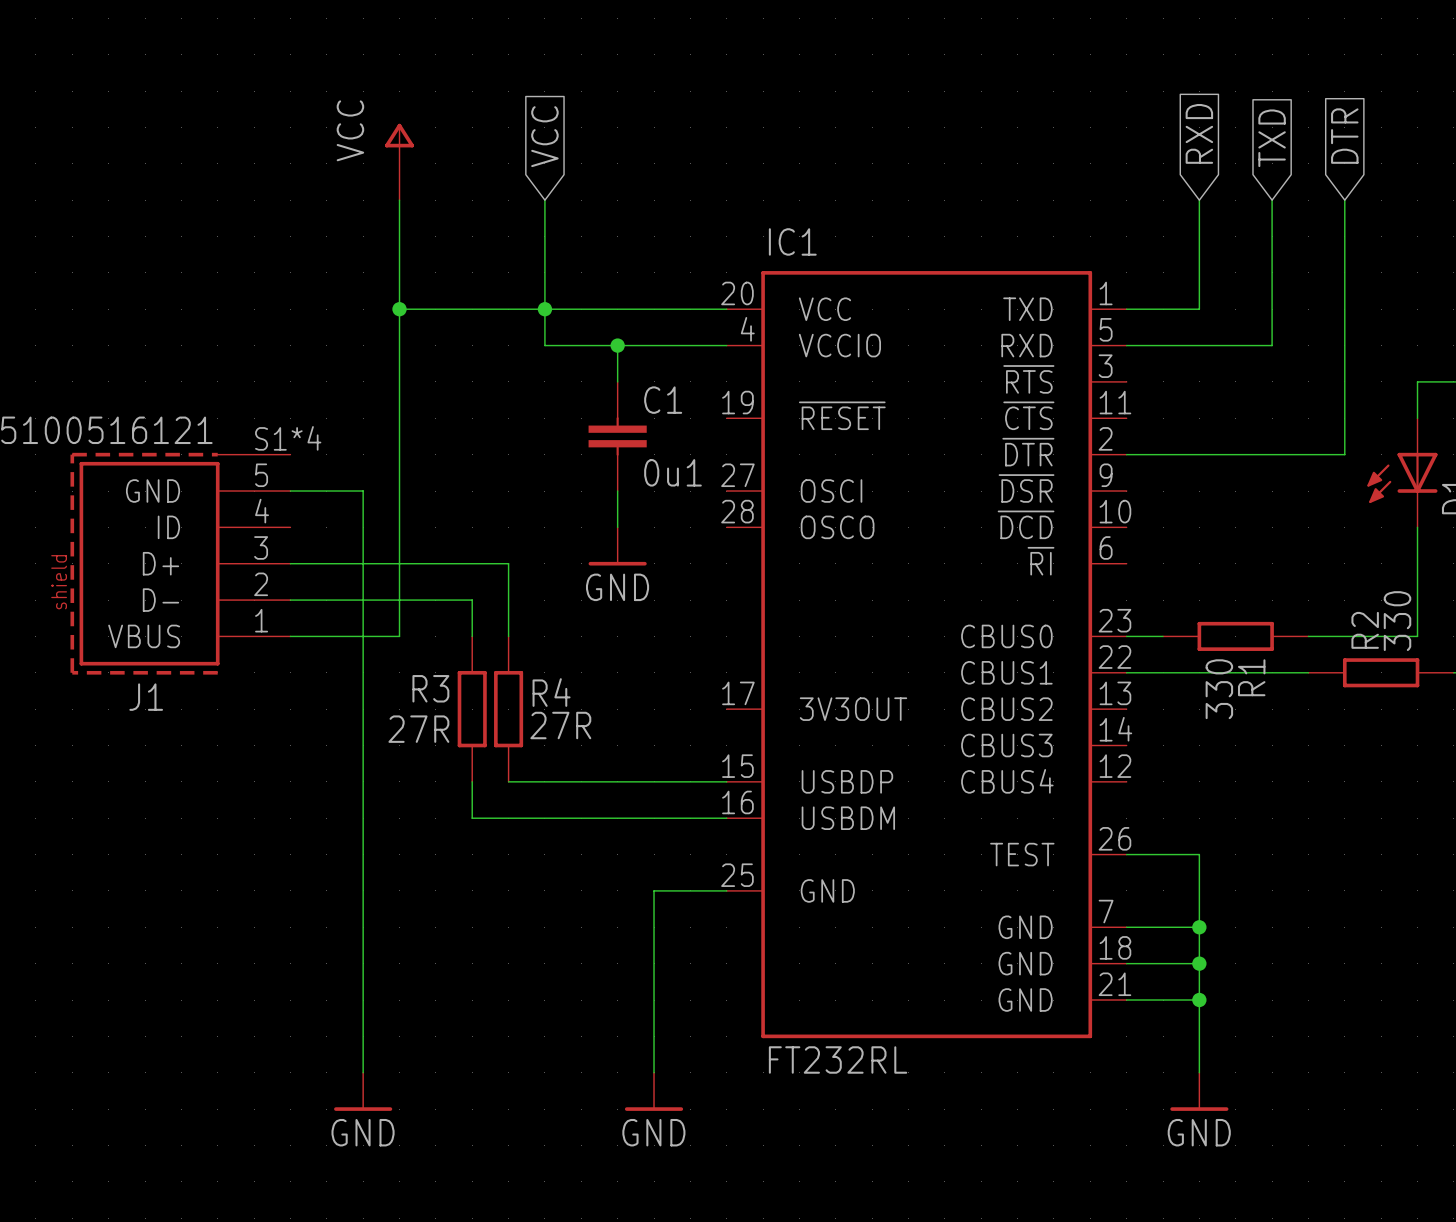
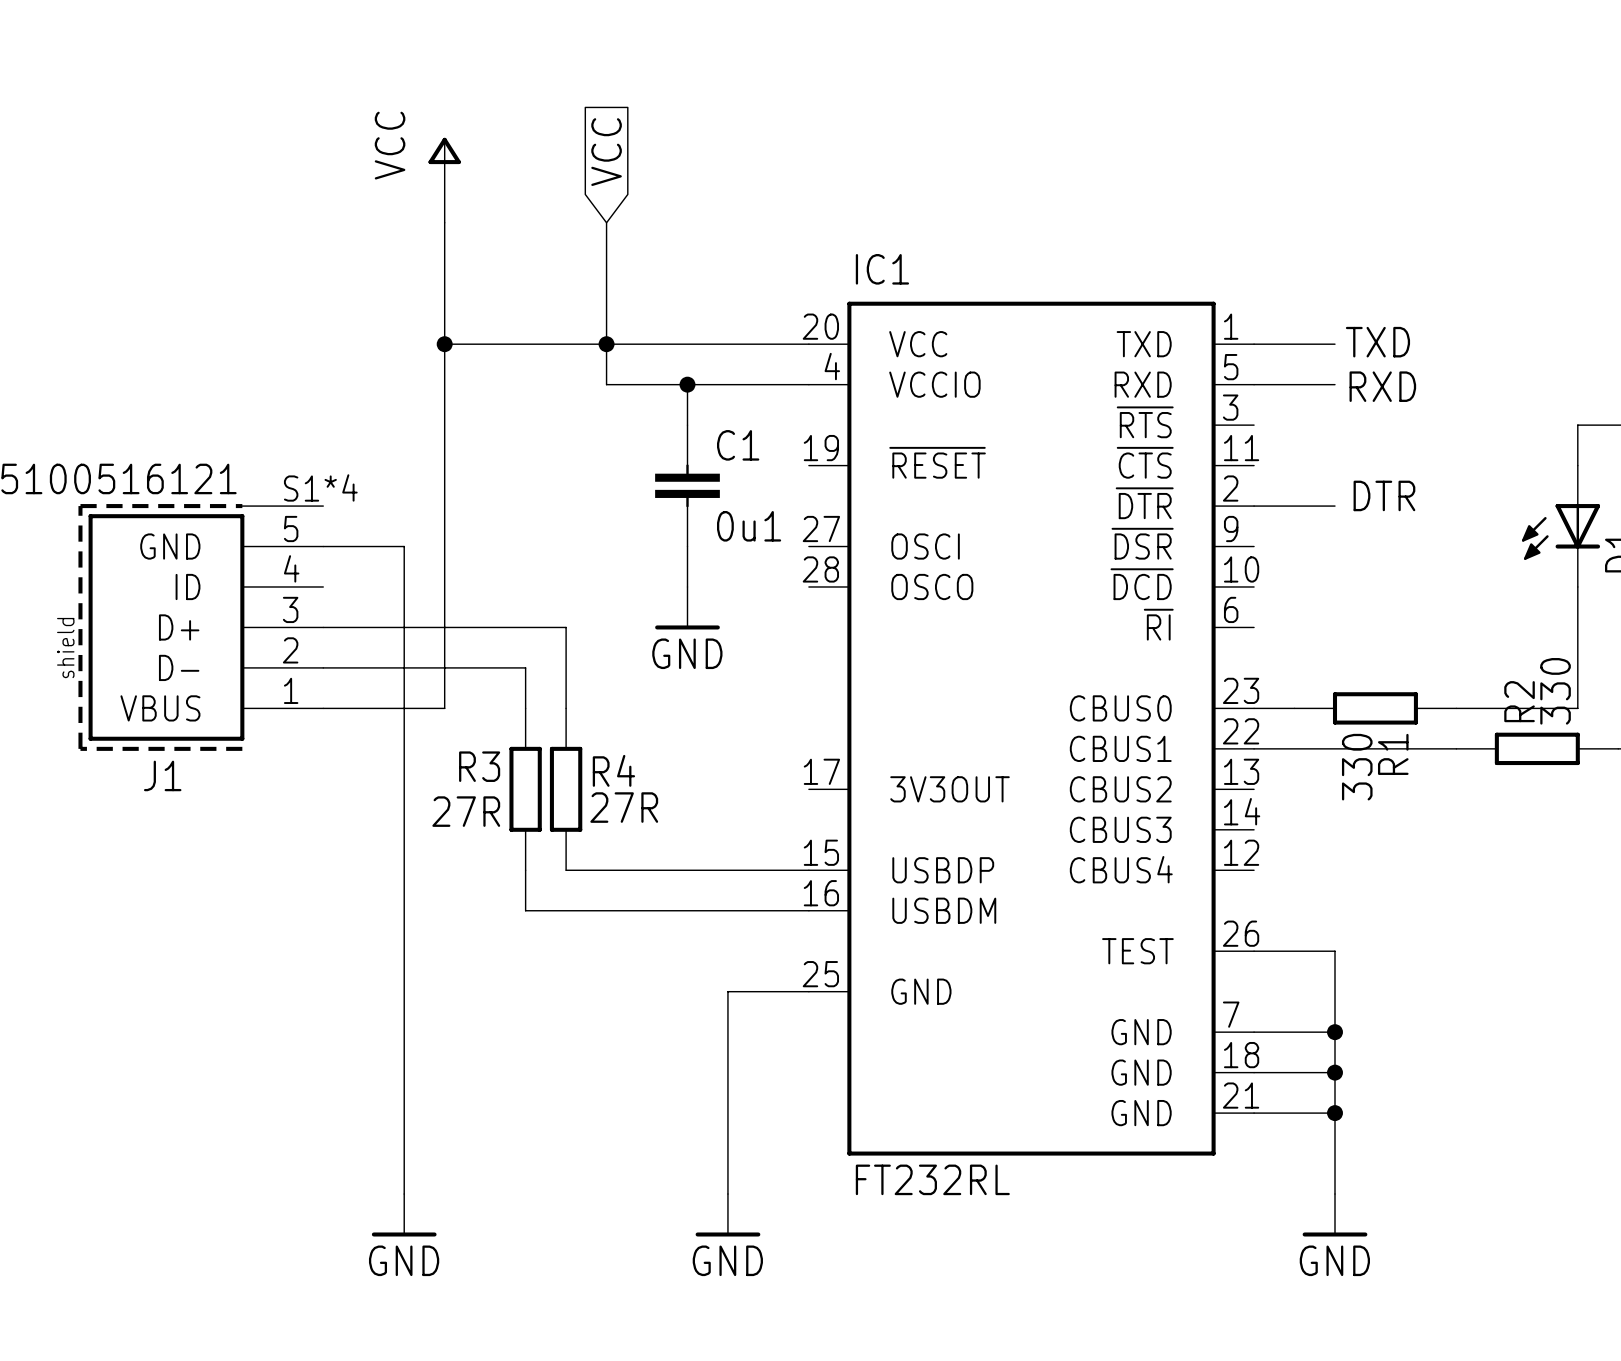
global label: RXD (1199, 133) -> none
global label: DTR (1344, 136) -> none
global label: TXD (1272, 138) -> none
wire: (1199, 200) (1199, 309) -> none
wire: (1272, 200) (1272, 345) (1199, 345) -> none
wire: (1344, 200) (1344, 454) (1199, 454) -> none
label: none -> TXD (1377, 342)
label: none -> RXD (1382, 386)
label: none -> DTR (1384, 495)

